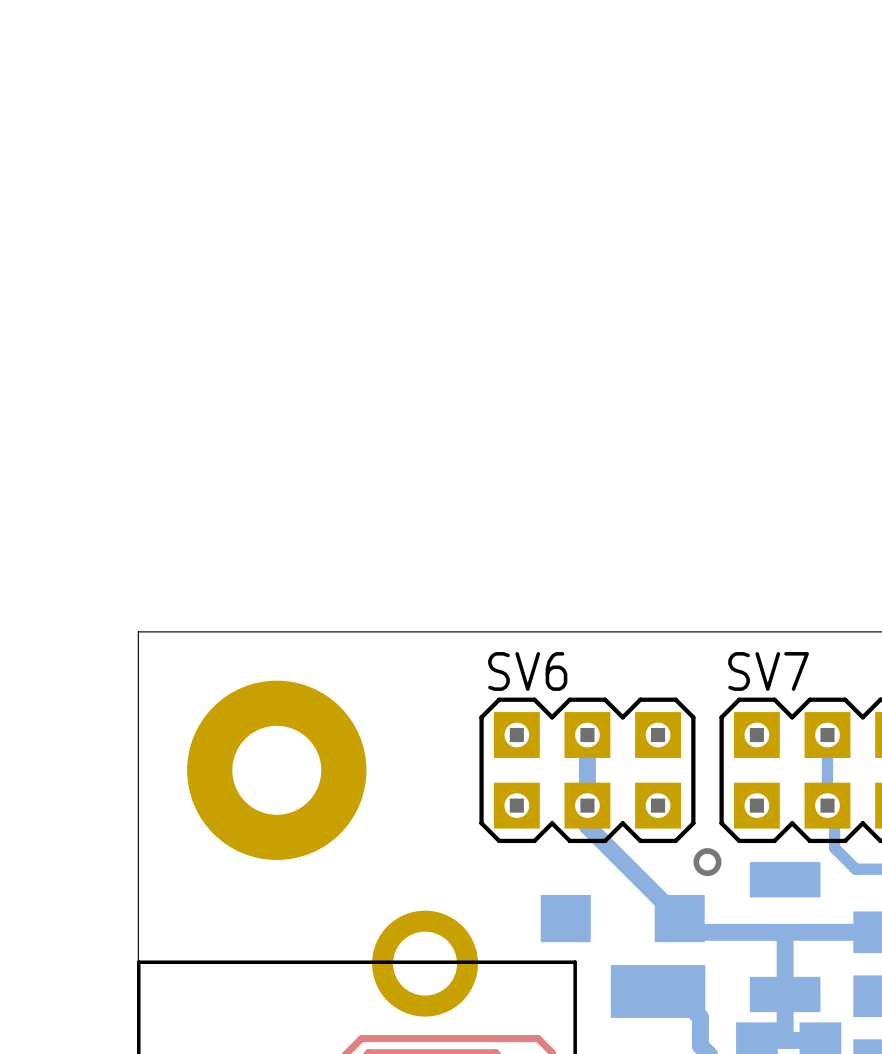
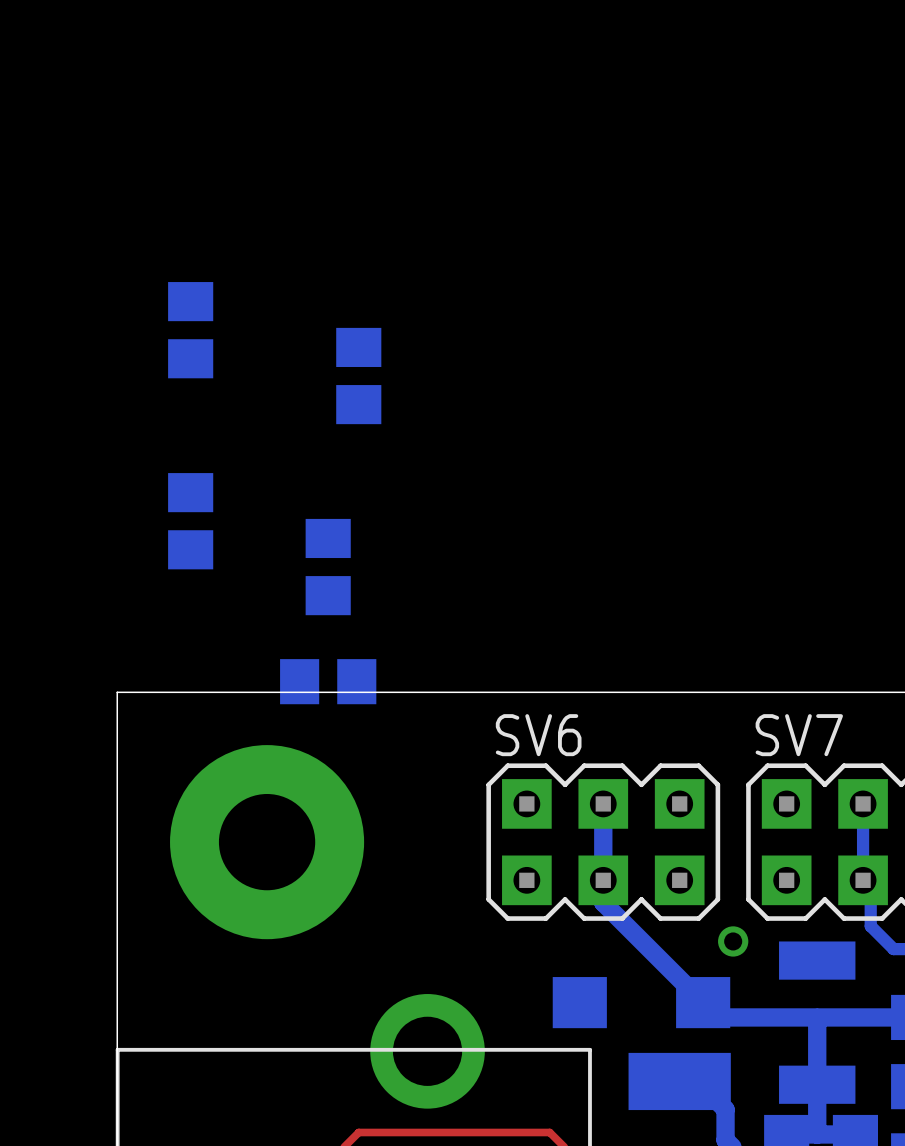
part: none -> (190, 330)
part: none -> (358, 376)
part: none -> (190, 521)
part: none -> (328, 567)
part: none -> (328, 681)

